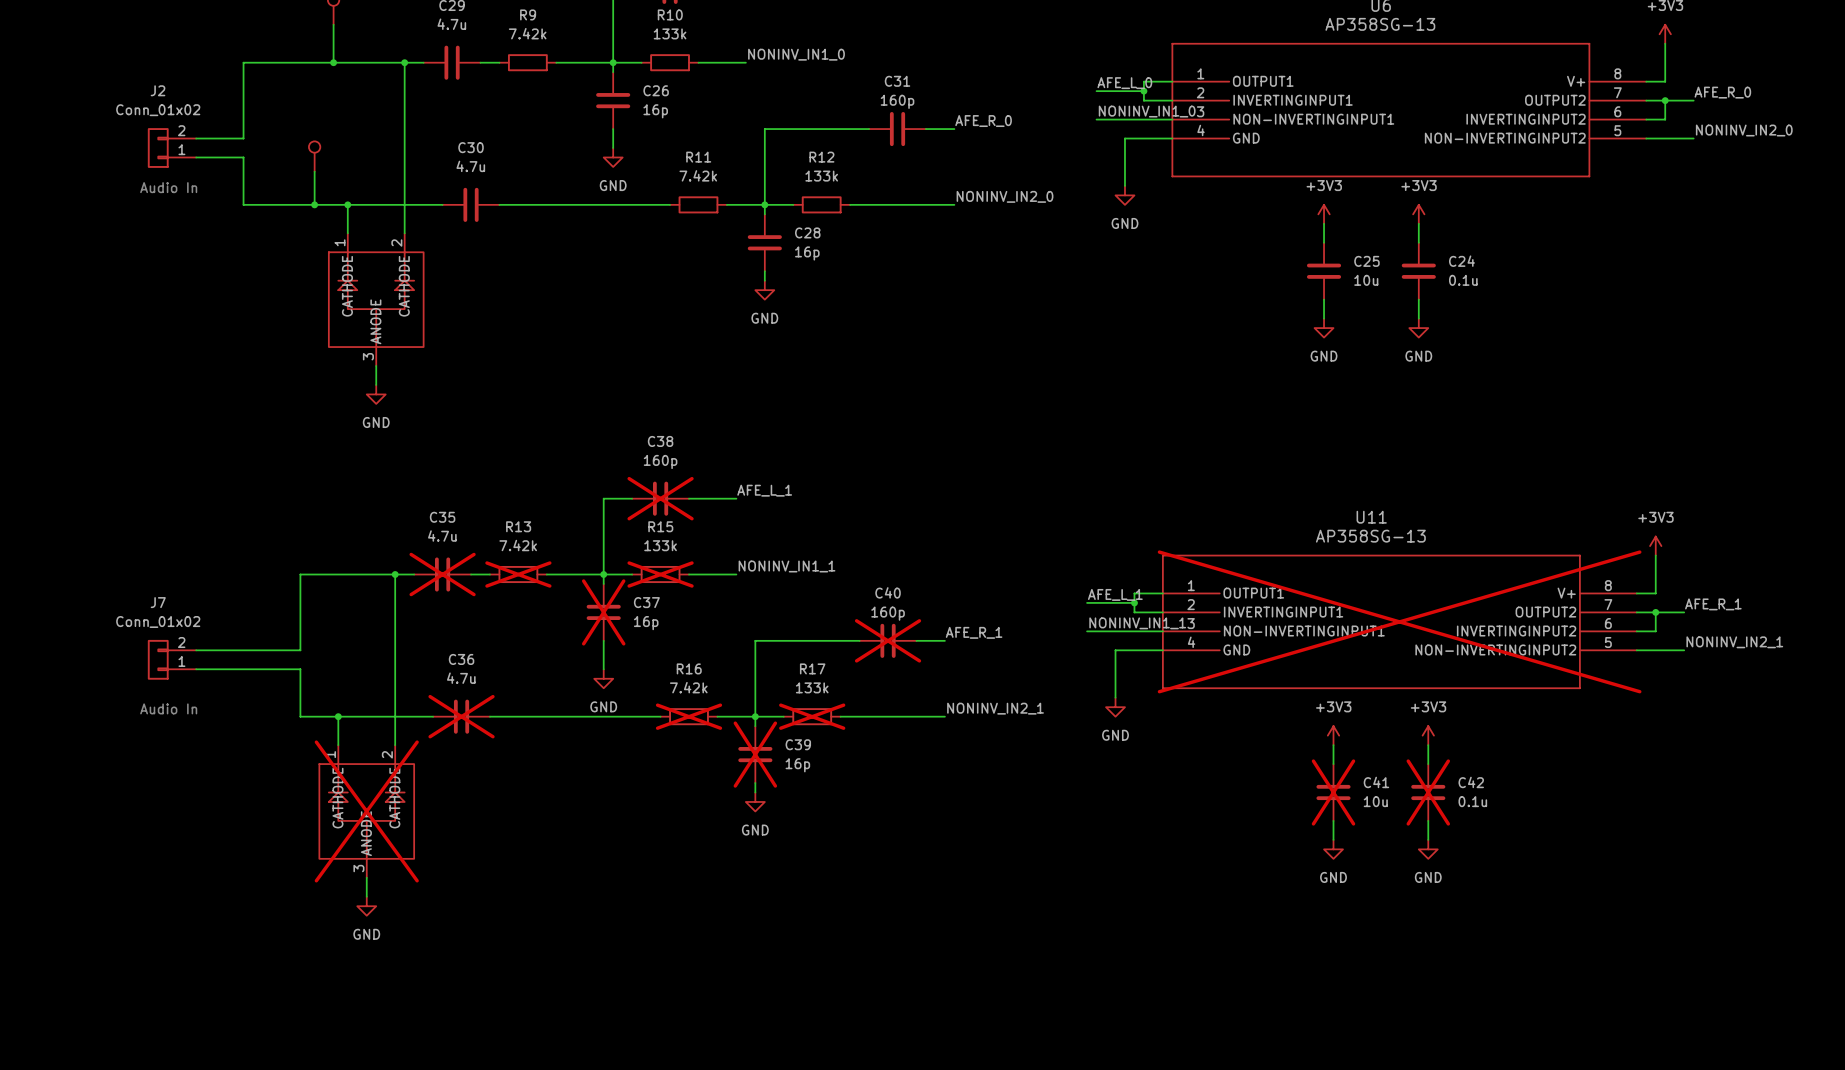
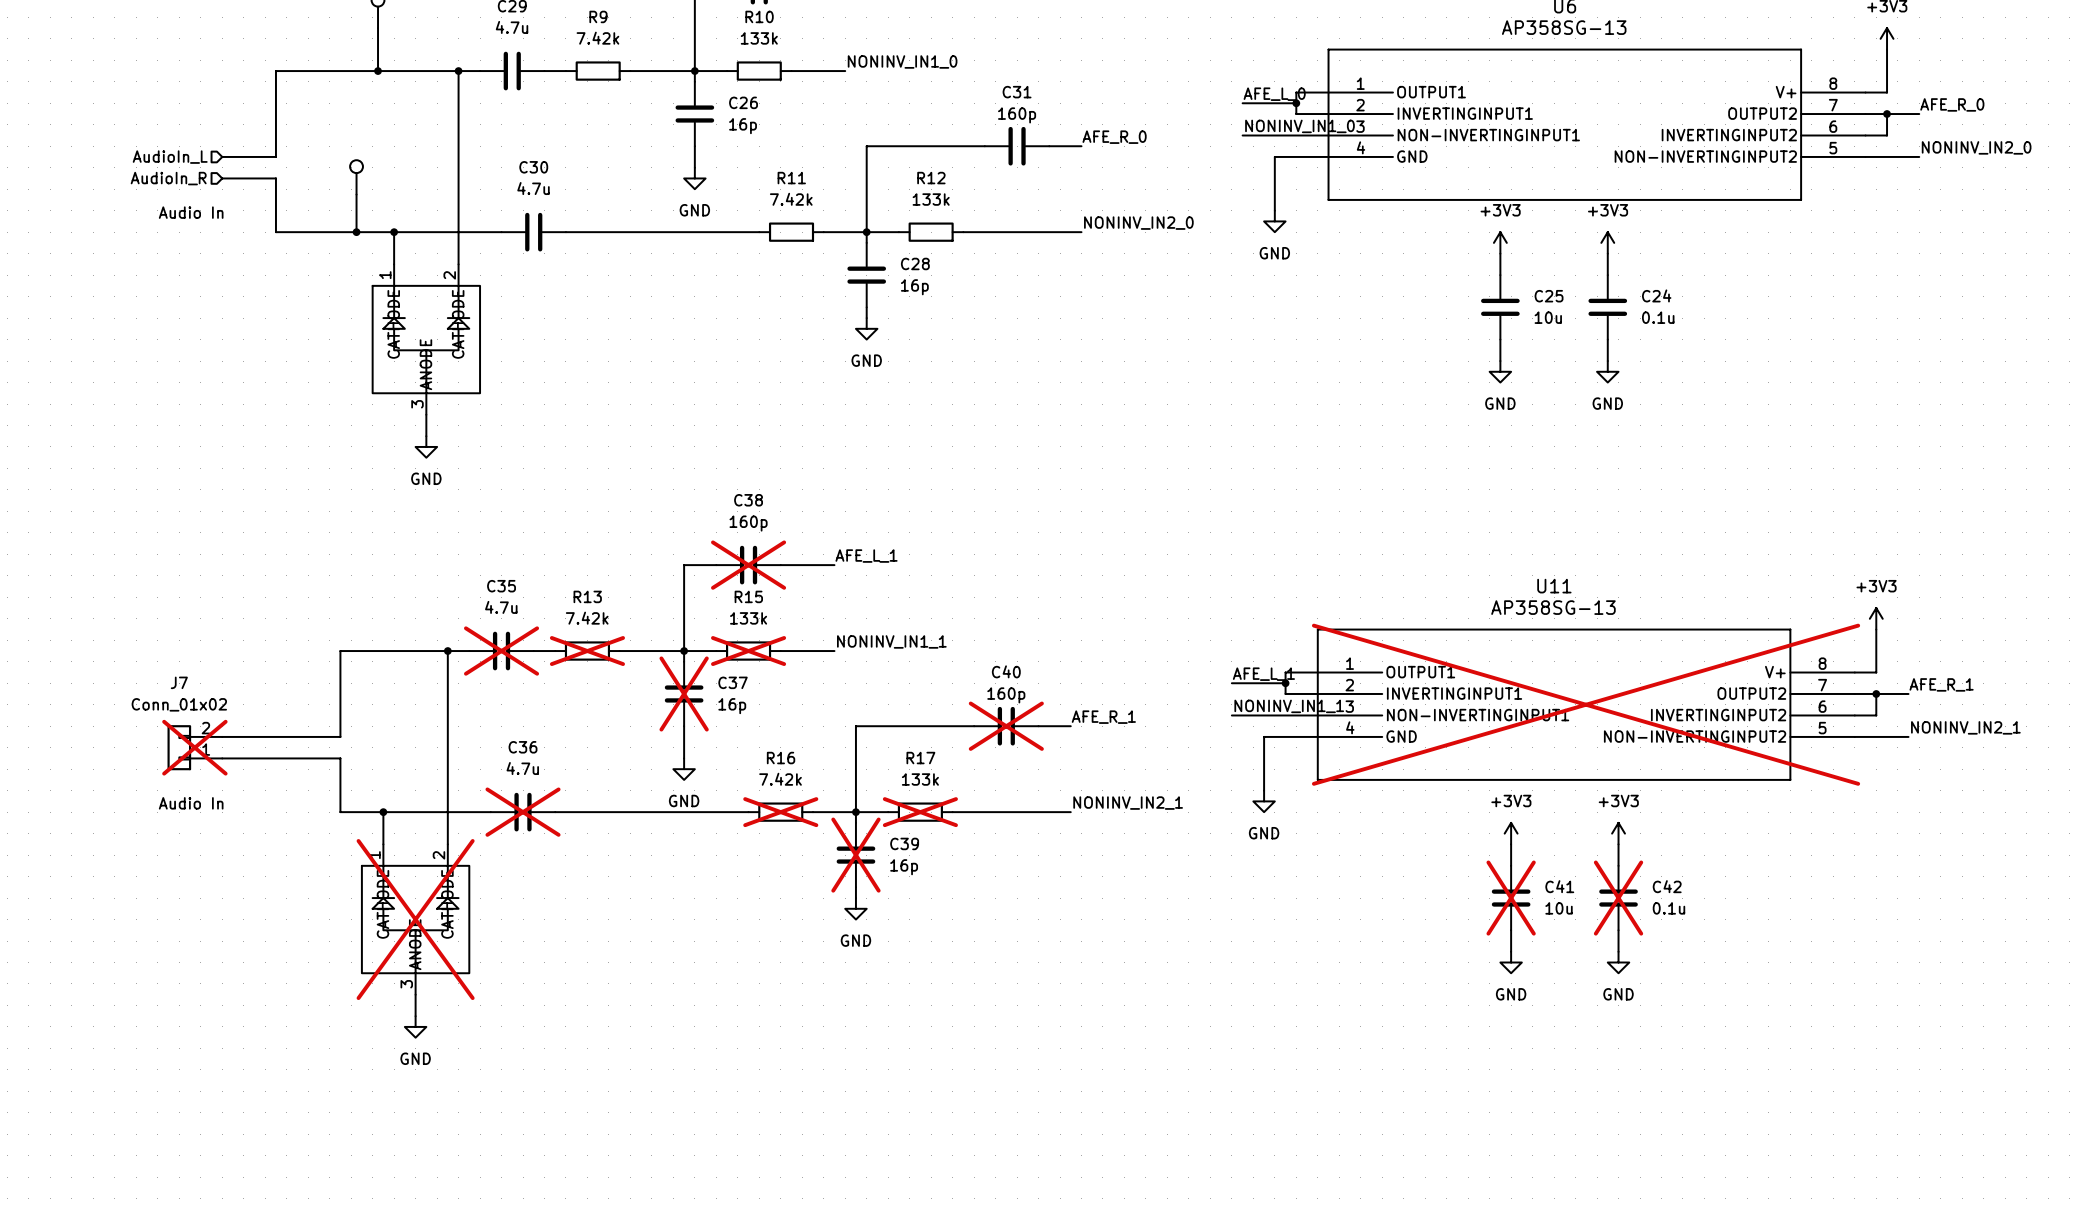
hierarchical label: none -> AudioIn_L (170, 157)
J2: Conn_01x02 (171, 148) -> none
hierarchical label: none -> AudioIn_R (168, 178)
J7 do-not-place cross: none -> (194, 747)

